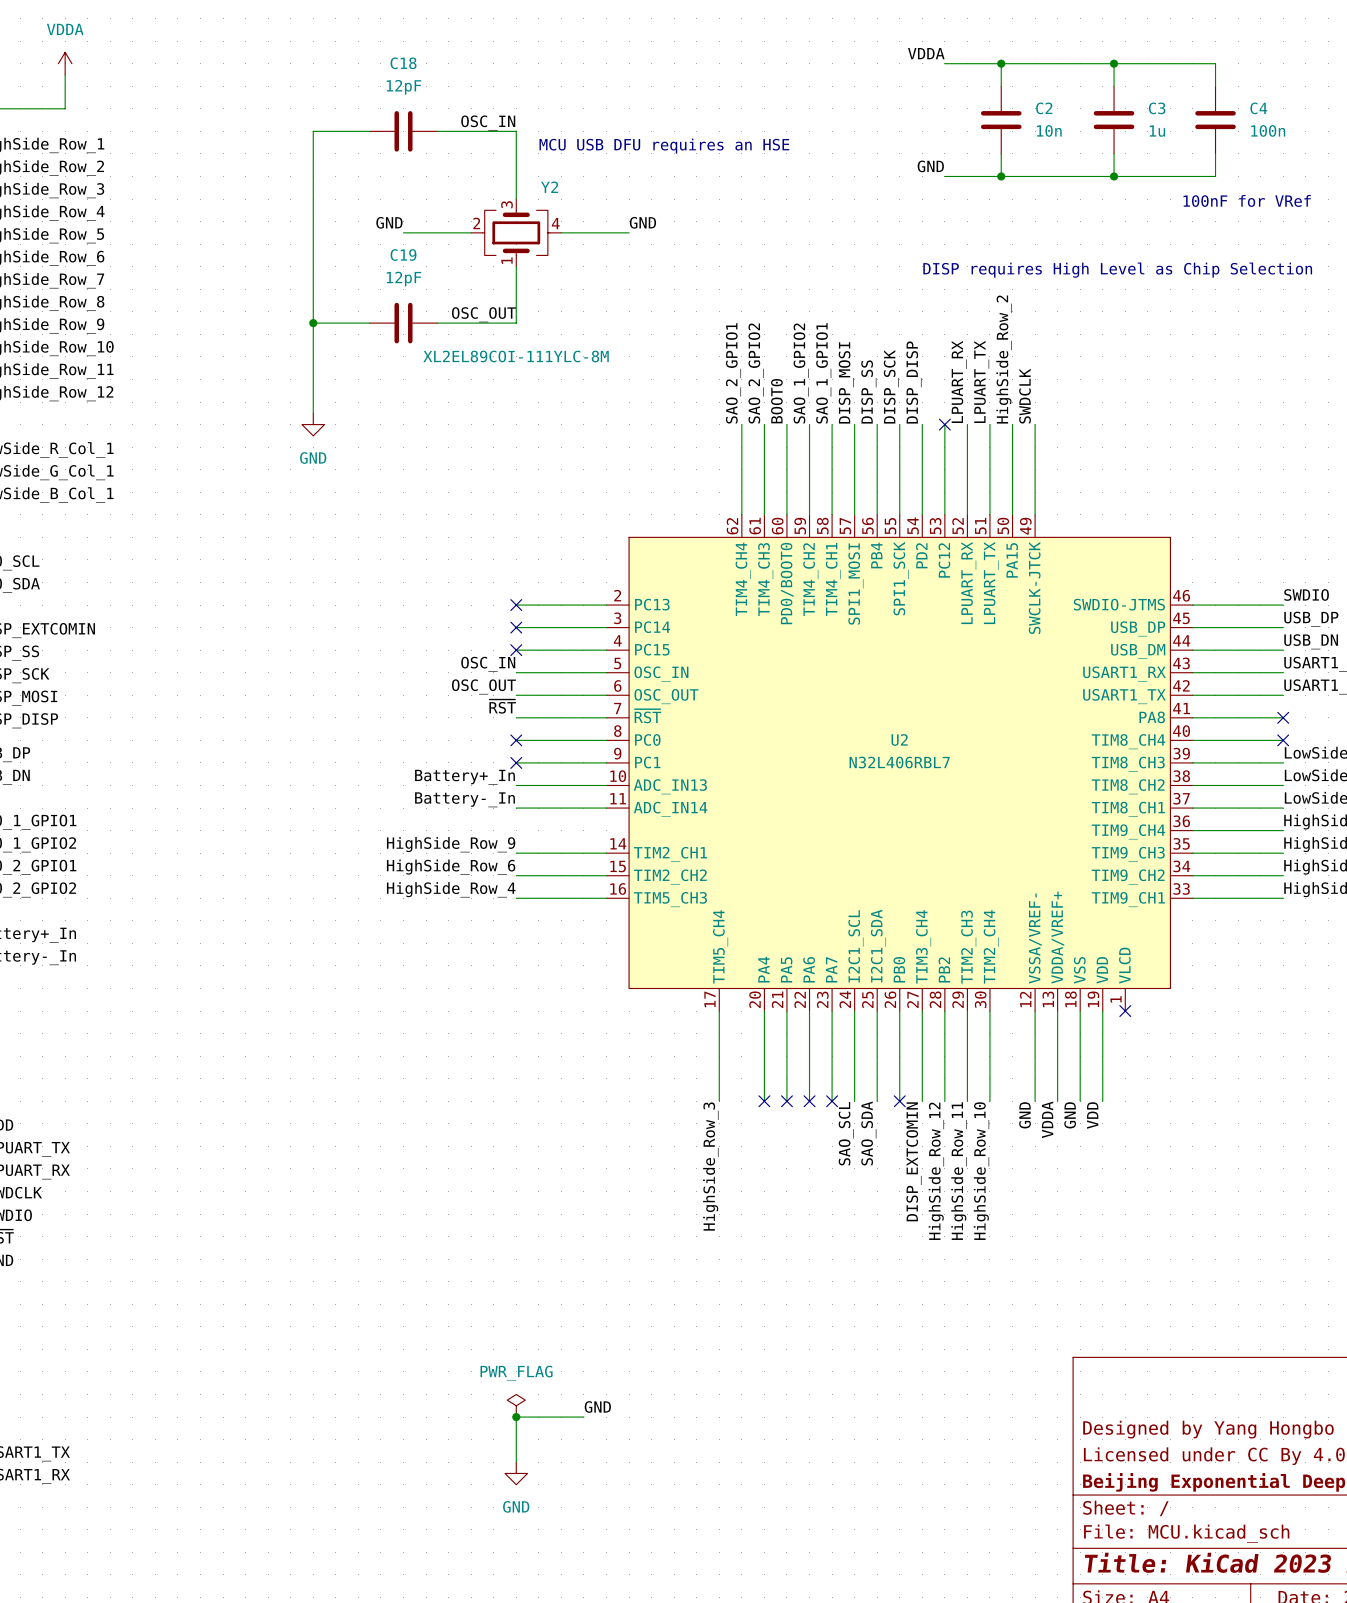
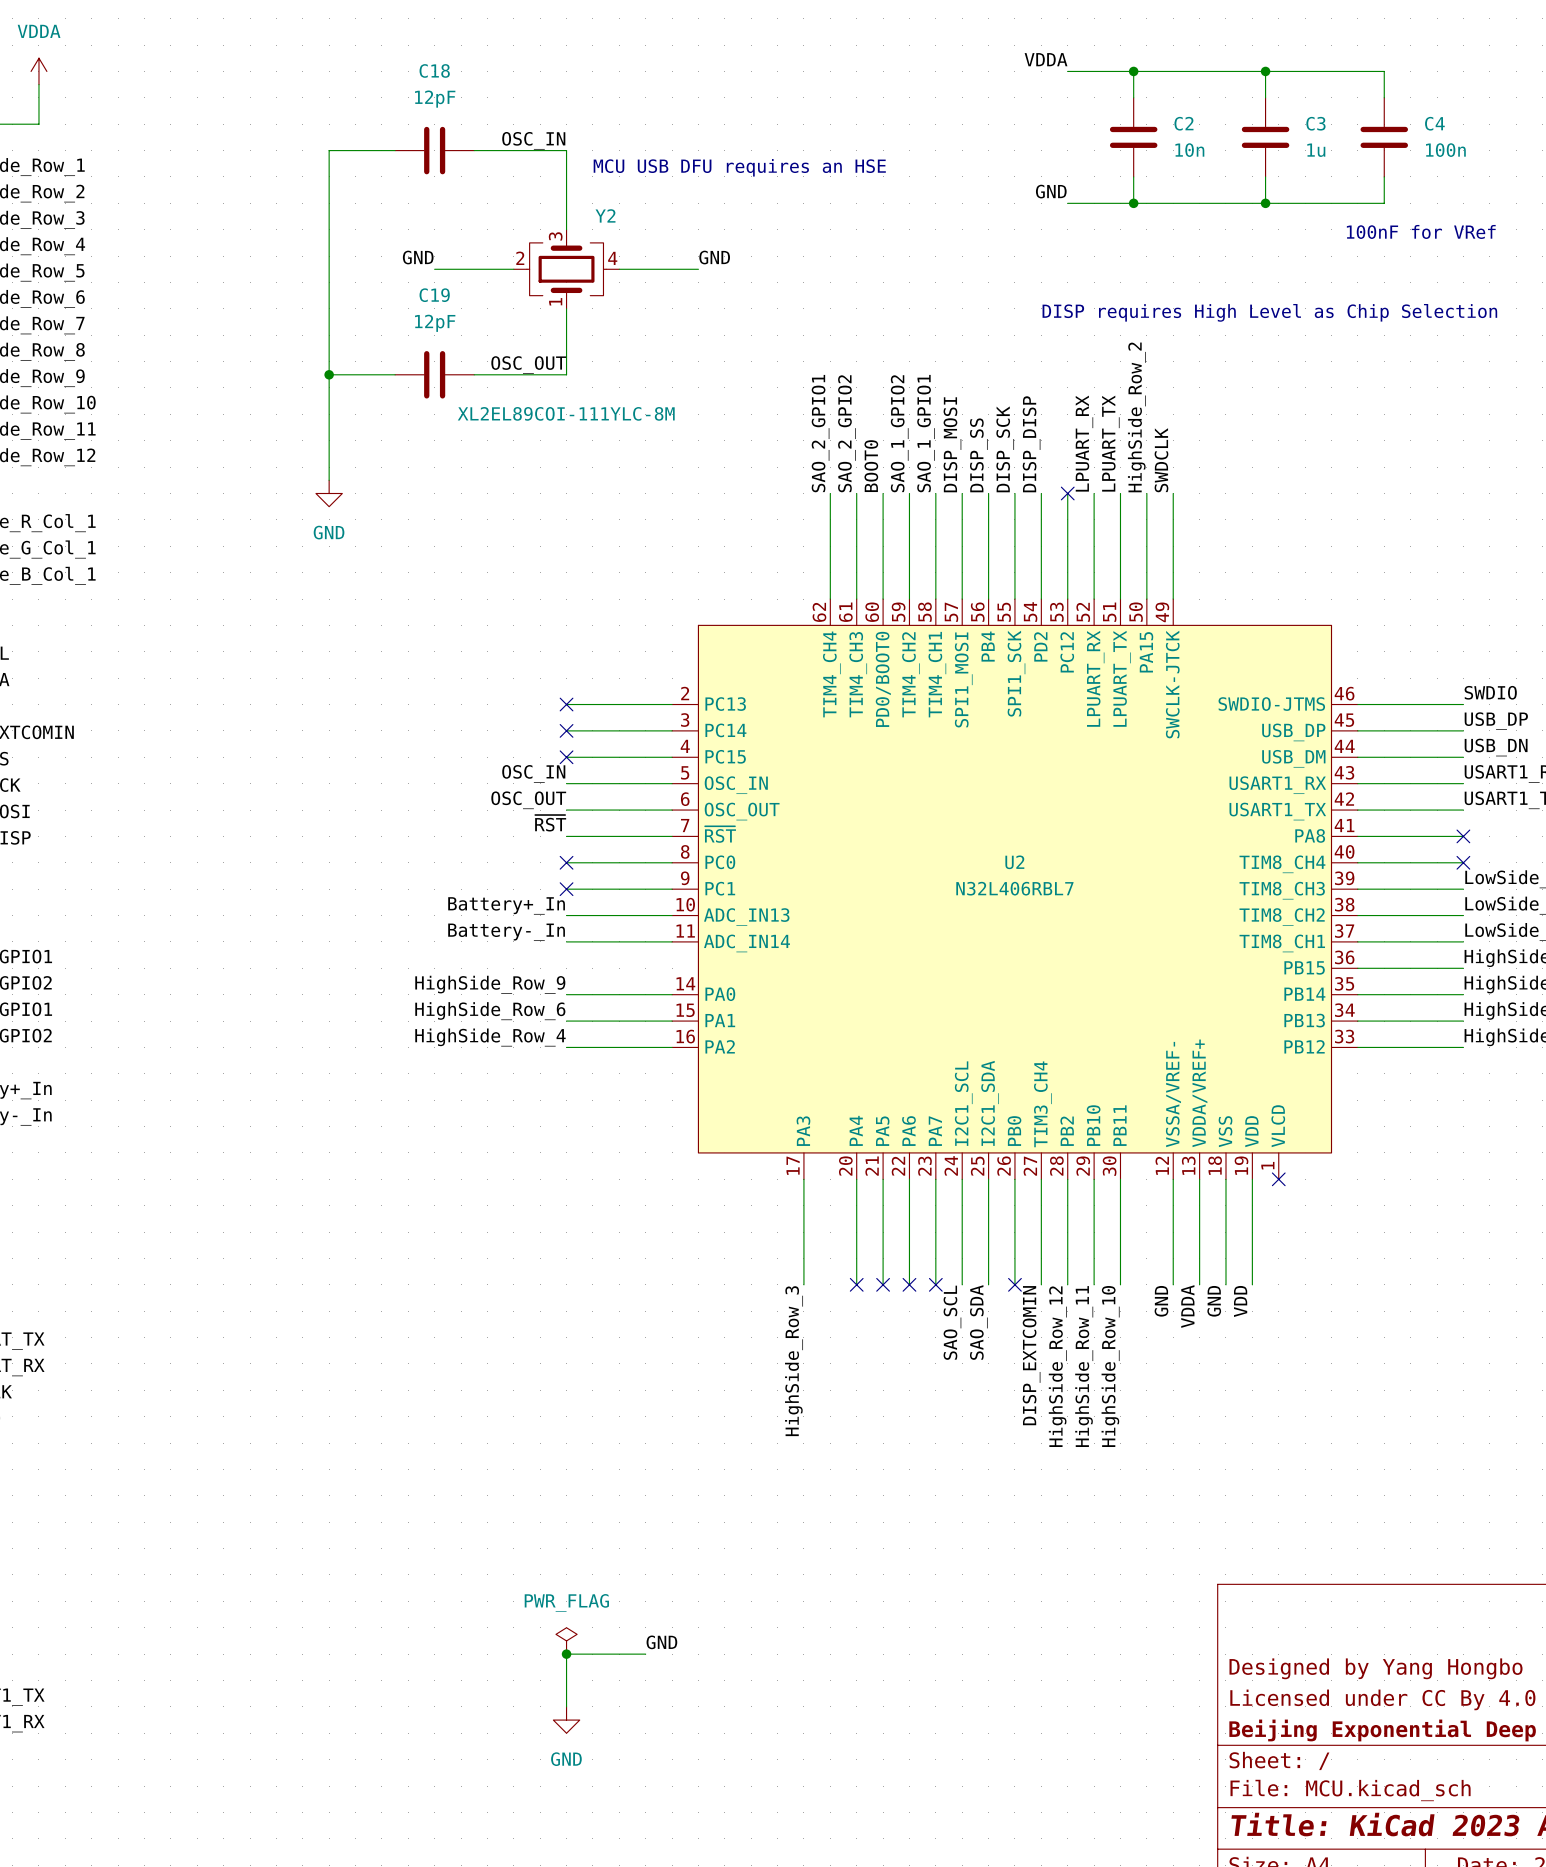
U2 symbol: [606, 514, 1193, 1012] -> [672, 599, 1358, 1180]

